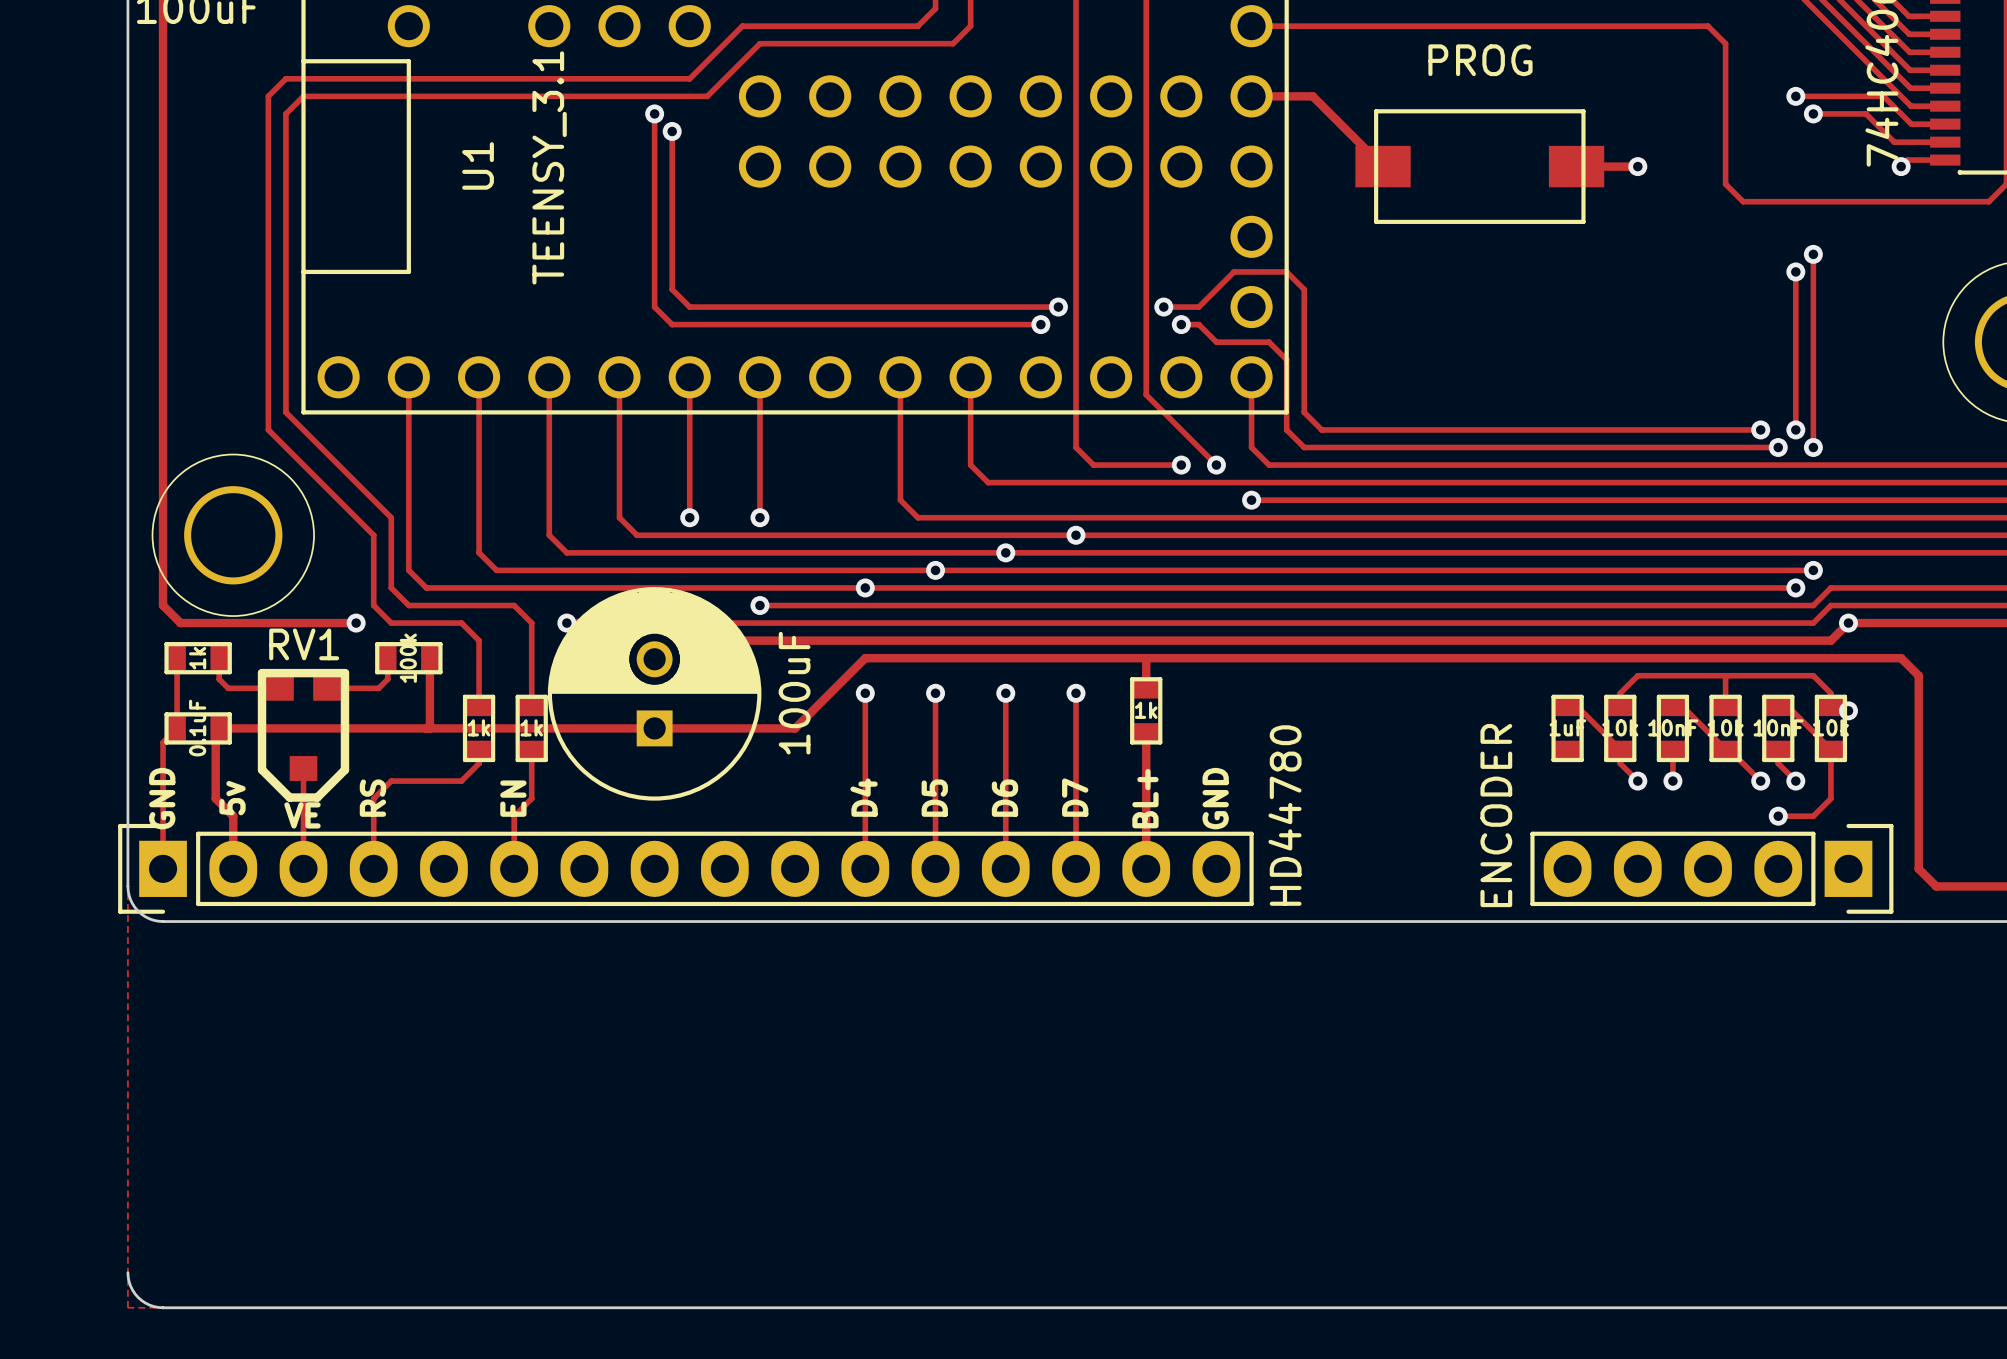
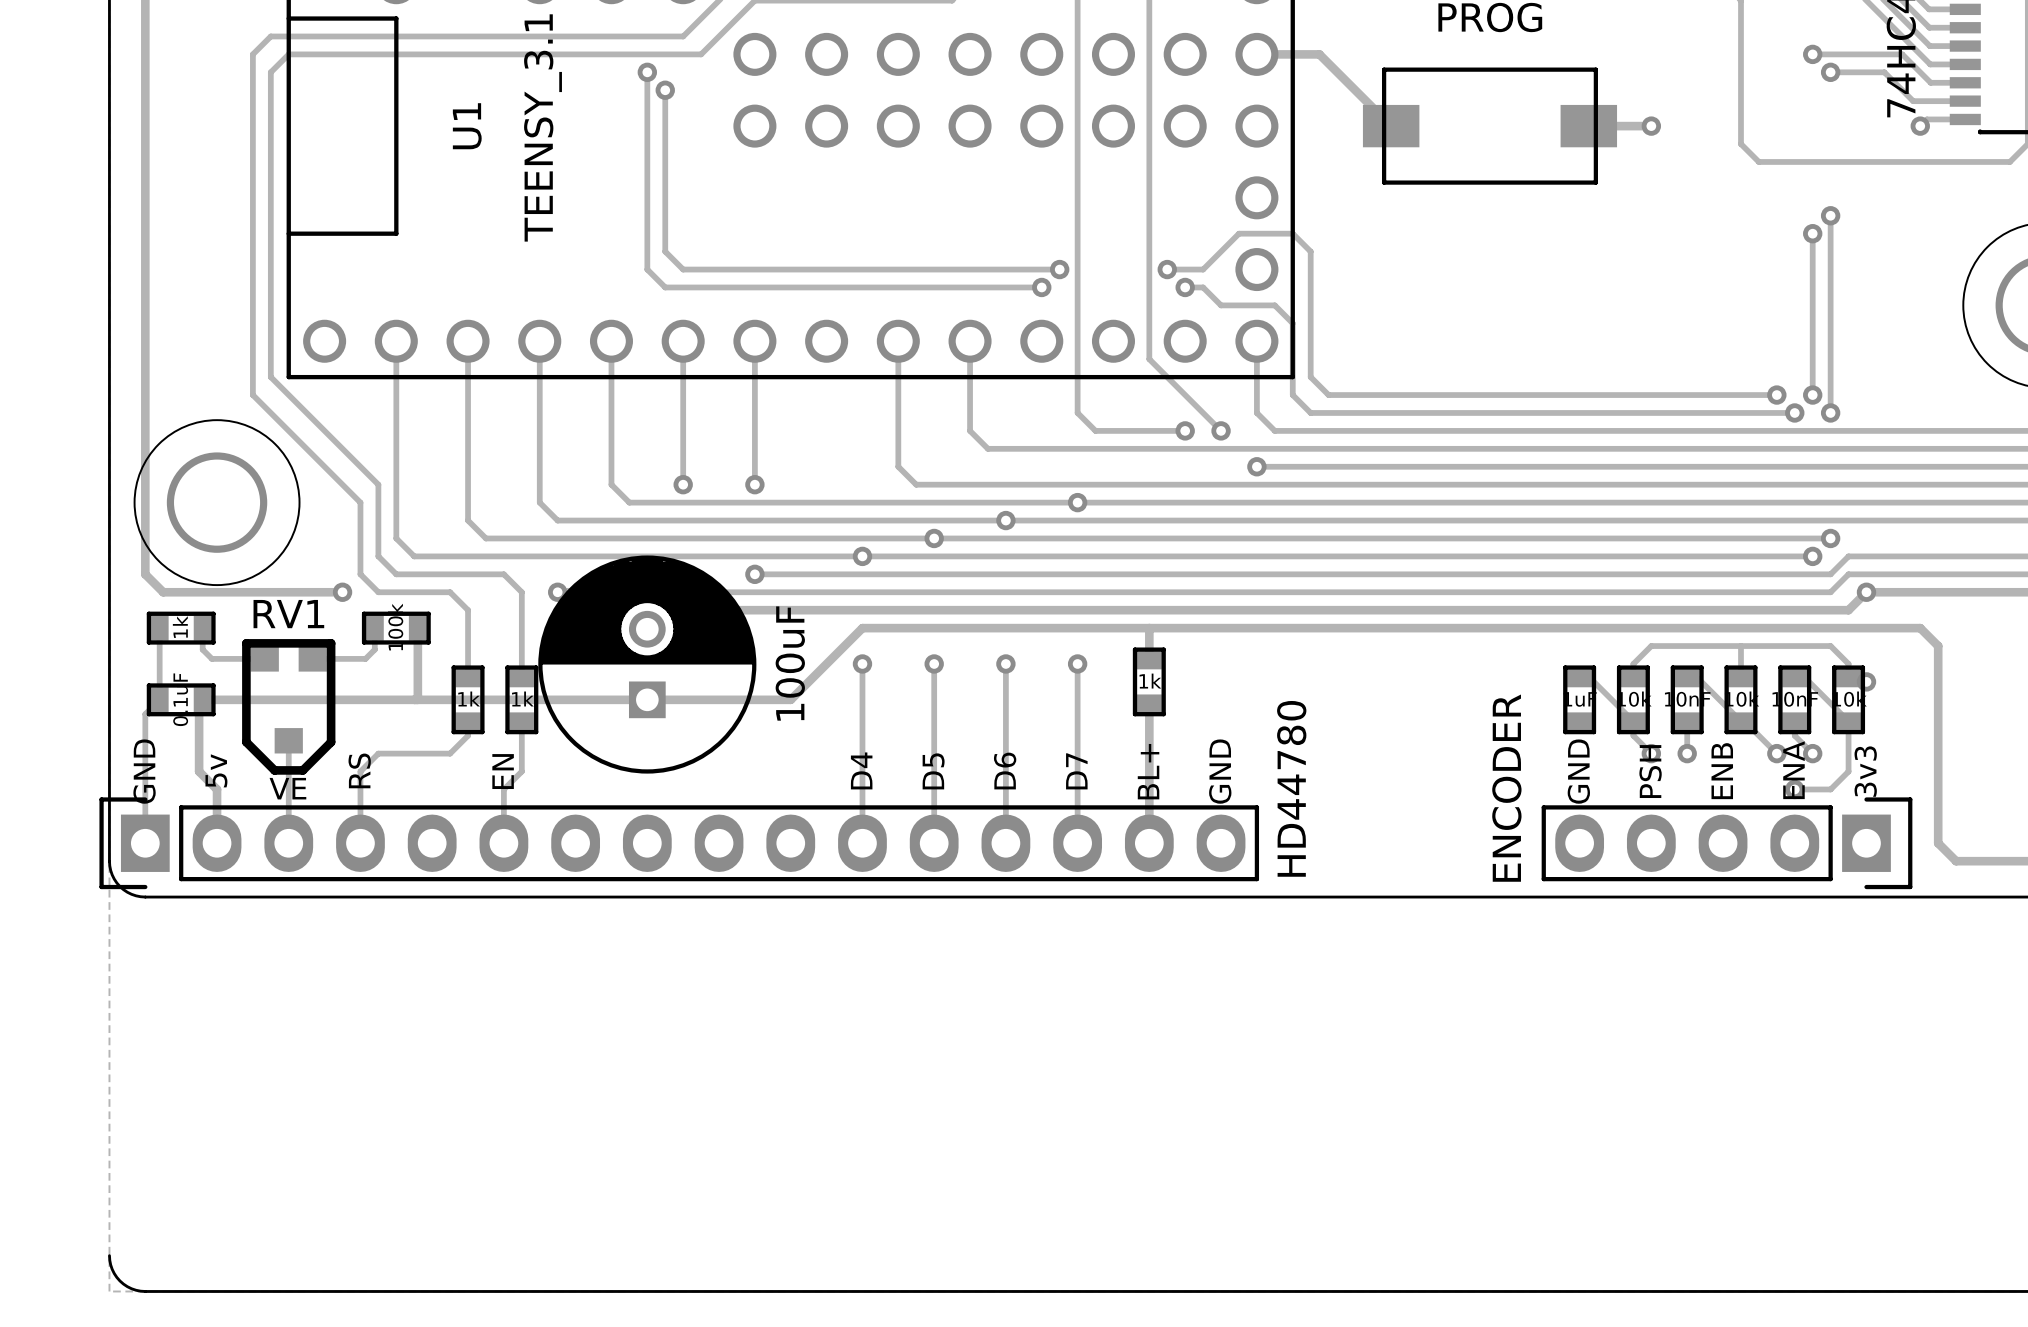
part text: none -> ENA (1793, 770)
part text: none -> GND (1578, 771)
part text: none -> PSH (1650, 771)
part text: none -> ENB (1722, 771)
part text: none -> 3v3 (1865, 771)

